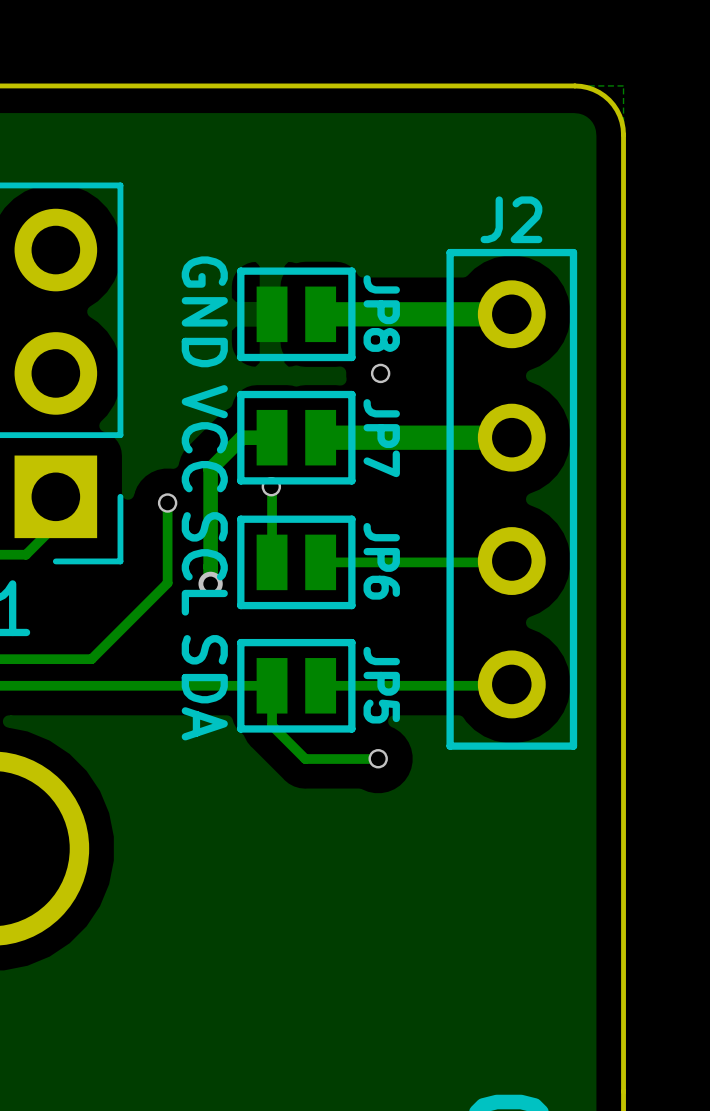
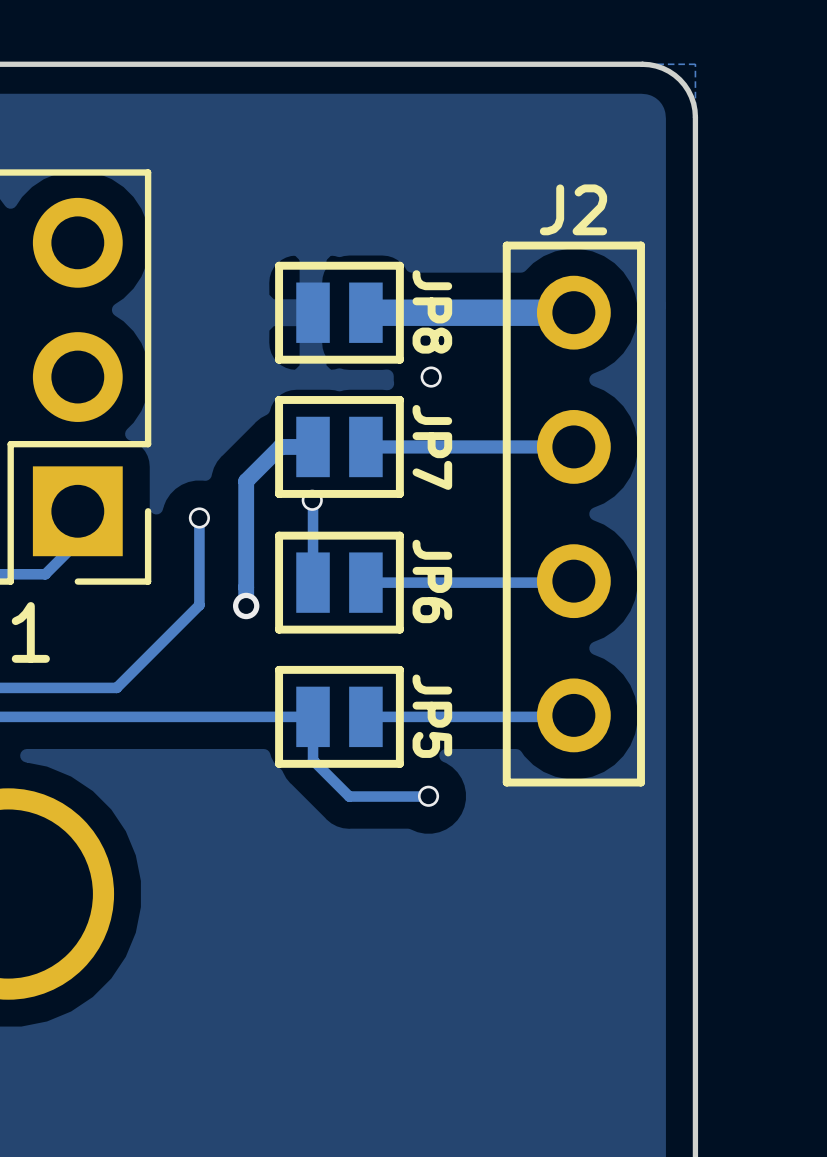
text: GND (204, 311) -> none
track width: thick (511, 437) (320, 437) -> thin (573, 446) (365, 446)
text: VCC (204, 438) -> none
text: SCL (204, 563) -> none
text: SDA (204, 687) -> none

